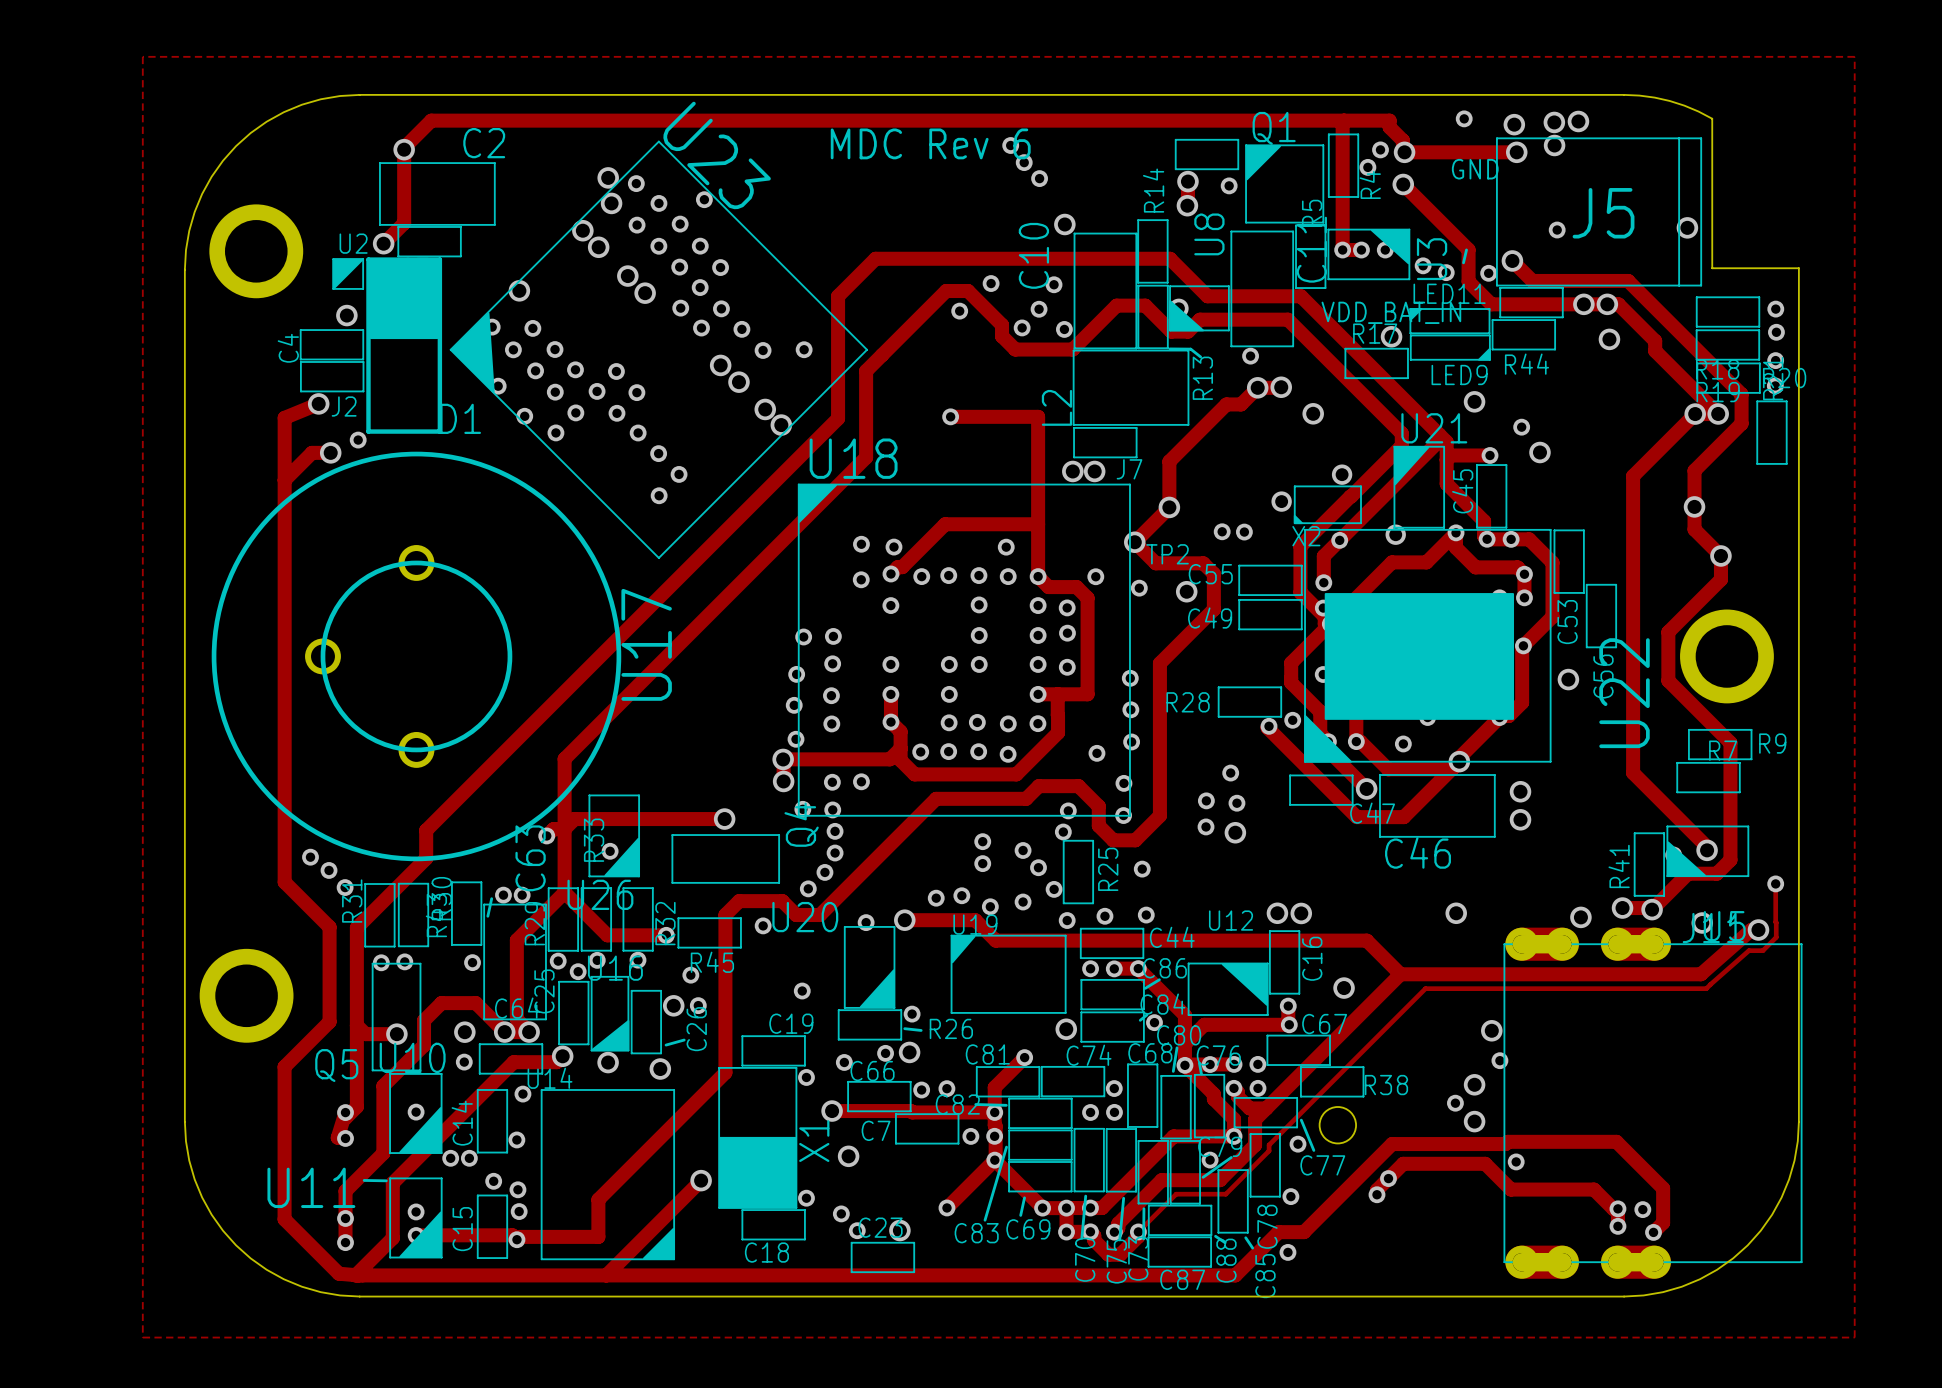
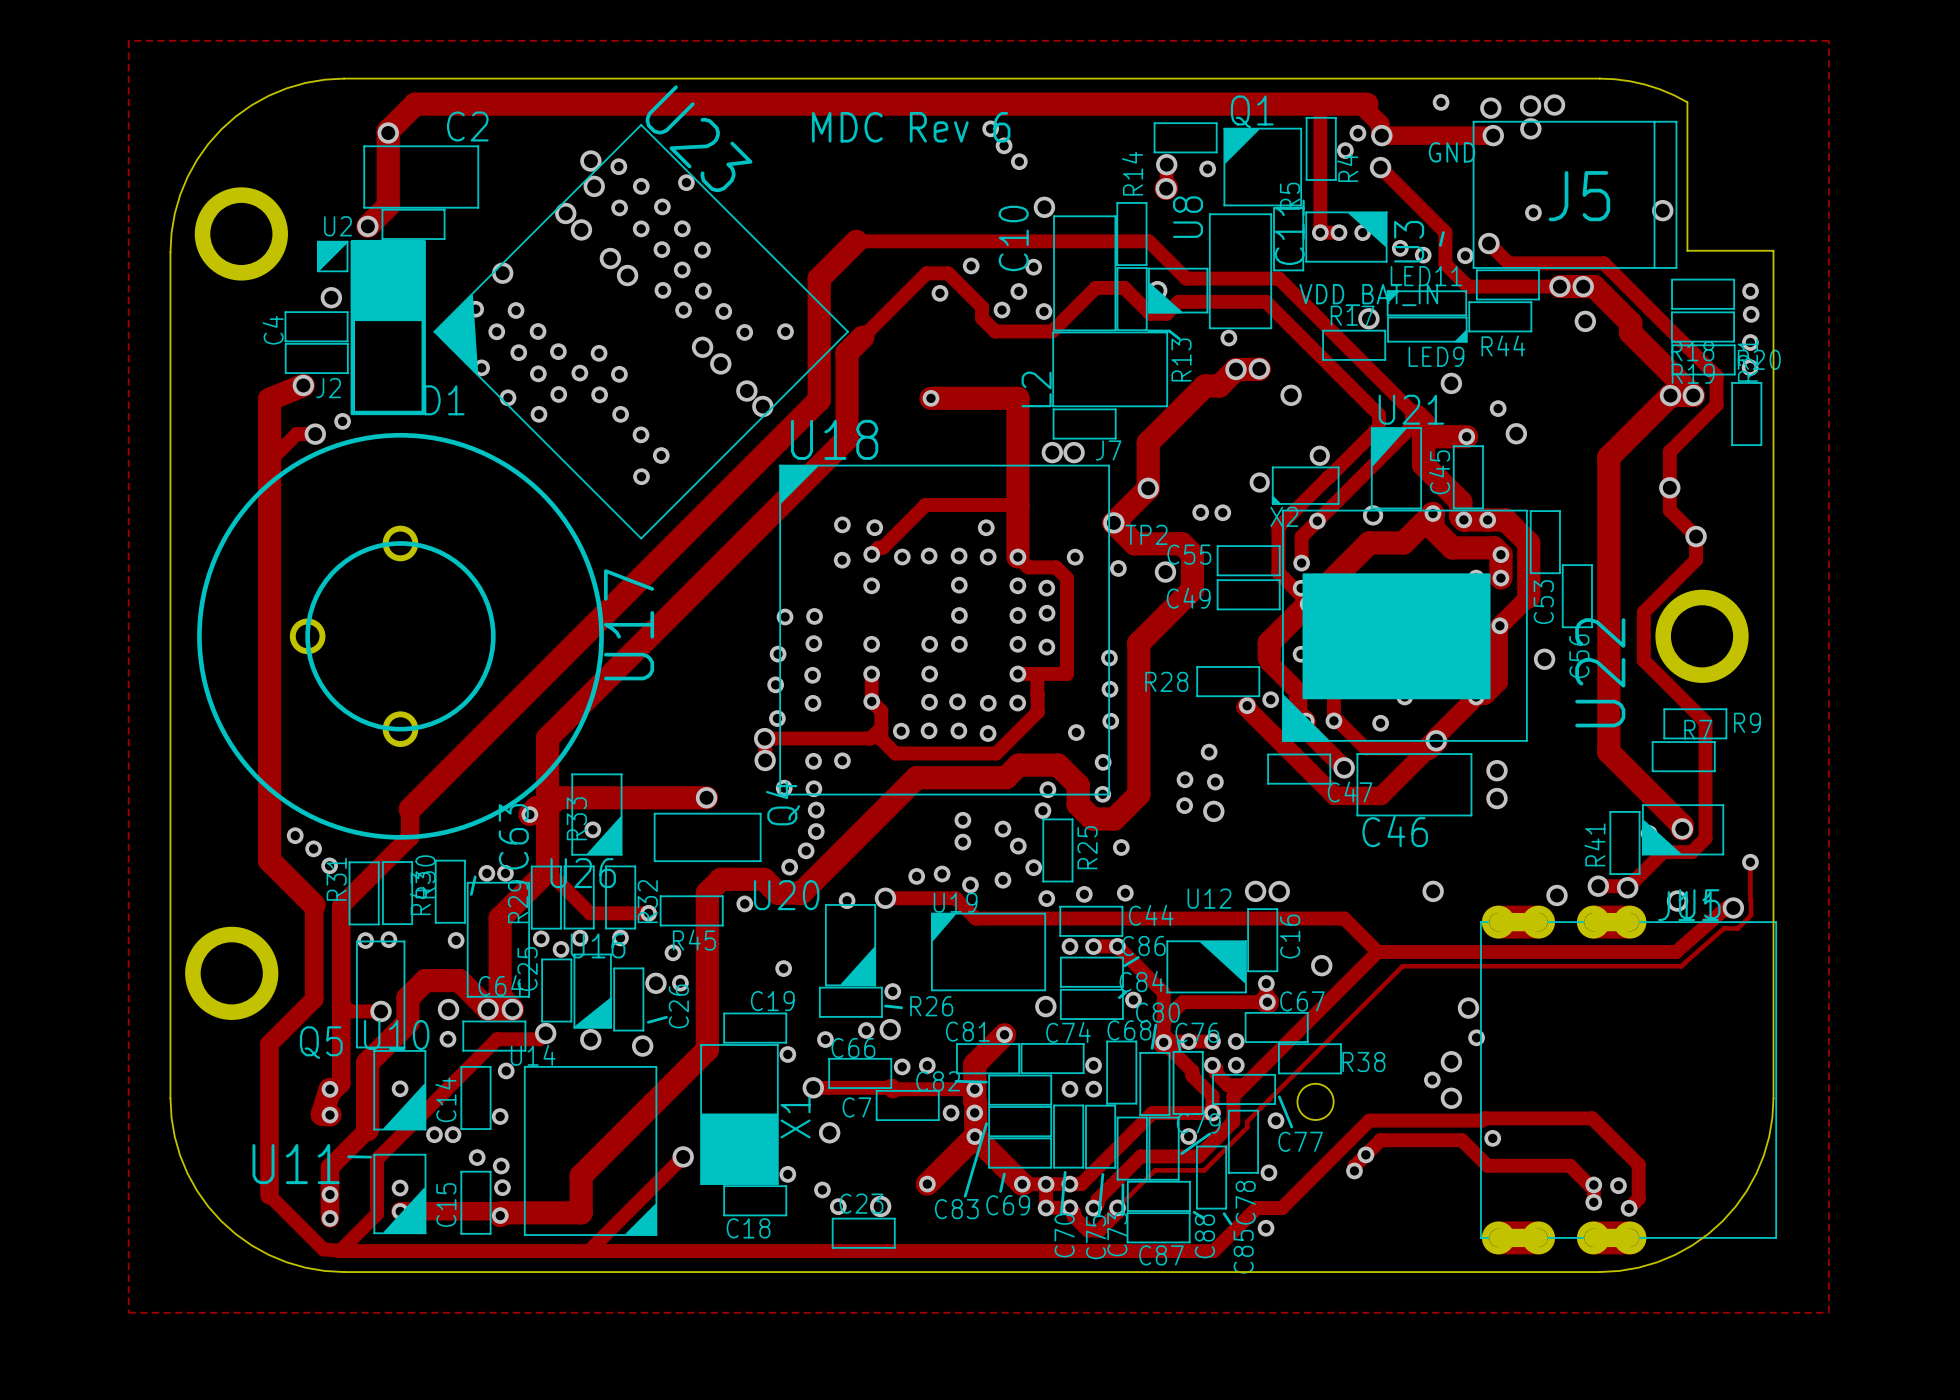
track width: thin (1516, 152) (1404, 152) (1402, 140) (1389, 127) (1389, 120) (431, 120) (404, 147) (404, 223) (383, 243) -> thick (1493, 135) (1381, 135) (1380, 123) (1366, 110) (1366, 104) (415, 104) (388, 131) (388, 205) (367, 226)
track width: thin (875, 258) (838, 296) (838, 418) (426, 830) (426, 858) (356, 927) (356, 1106) (345, 1118) (345, 1112) (337, 1137) (345, 1138) -> thick (856, 241) (819, 278) (819, 400) (410, 809) (410, 836) (341, 905) (341, 1083) (330, 1094) (330, 1089) (322, 1114) (330, 1115)
track width: thin (1583, 304) (1618, 304) (1655, 341) (1655, 350) (1718, 413) (1695, 414) (1633, 476) (1633, 772) (1707, 846) (1707, 850) -> thick (1559, 286) (1594, 286) (1630, 323) (1630, 332) (1693, 395) (1670, 395) (1608, 457) (1608, 752) (1682, 825) (1682, 828)
track width: thin (882, 355) (866, 371) (866, 457) (564, 758) (564, 892) (516, 940) (516, 1019) (529, 1032) (504, 1032) (475, 1003) (441, 1003) (424, 1020) (424, 1045) (383, 1086) (383, 1153) (345, 1191) (345, 1242) -> thick (862, 337) (847, 352) (847, 438) (547, 738) (547, 870) (500, 918) (500, 996) (512, 1009) (488, 1009) (459, 980) (425, 980) (407, 998) (407, 1022) (367, 1062) (367, 1129) (330, 1167) (330, 1218)
track width: thin (1281, 387) (1257, 387) (1241, 404) (1226, 404) (1169, 461) (1169, 507) (1134, 542) (1155, 563) (1203, 563) (1213, 573) (1213, 609) (1159, 663) (1159, 815) (1135, 840) (1113, 840) (1098, 825) (1098, 806) (1078, 786) (1038, 786) (1026, 798) (936, 798) (819, 915) (796, 915) (782, 901) (739, 901) (725, 914) (725, 1072) (598, 1199) (598, 1236) (519, 1236) (516, 1239) (512, 1235) (416, 1235) -> thick (1259, 368) (1235, 369) (1219, 386) (1204, 386) (1148, 442) (1148, 488) (1113, 522) (1134, 543) (1182, 543) (1192, 554) (1192, 589) (1138, 643) (1138, 794) (1114, 818) (1092, 818) (1078, 804) (1078, 785) (1058, 765) (1018, 765) (1005, 777) (916, 777) (801, 893) (777, 893) (763, 879) (721, 879) (707, 893) (707, 1049) (581, 1175) (581, 1212) (503, 1212) (500, 1215) (495, 1211) (400, 1211)
track width: thin (318, 403) (284, 417) (284, 882) (329, 927) (329, 1021) (284, 1066) (284, 1219) -> thick (303, 385) (269, 399) (269, 860) (314, 905) (314, 999) (269, 1043) (269, 1195)
track width: thin (950, 416) (1038, 416) (1038, 576) -> thick (930, 398) (1017, 398) (1017, 557)
track width: thin (1439, 434) (1446, 442) (1446, 483) (1484, 521) (1484, 536) (1487, 539) (1529, 539) (1552, 562) (1552, 616) (1522, 647) (1522, 702) (1508, 715) (1501, 715) (1459, 757) (1459, 761) (1403, 817) (1356, 817) (1267, 727) (1269, 726) -> thick (1416, 416) (1423, 423) (1423, 464) (1460, 502) (1460, 516) (1463, 520) (1505, 520) (1528, 543) (1528, 596) (1498, 627) (1498, 682) (1485, 695) (1477, 695) (1436, 736) (1436, 740) (1381, 795) (1334, 795) (1245, 707) (1247, 705)
track width: thin (1490, 455) (1451, 455) (1446, 459) -> thick (1466, 436) (1427, 436) (1423, 441)
track width: thin (1524, 597) (1524, 574) (1517, 567) (1475, 567) (1455, 547) (1455, 532) (1426, 562) (1391, 562) (1327, 626) -> thick (1500, 578) (1500, 554) (1494, 547) (1452, 547) (1432, 528) (1432, 513) (1403, 542) (1369, 542) (1305, 607)
track width: thin (1327, 626) (1291, 663) (1291, 682) (1320, 711) (1320, 733) (1328, 741) (1328, 750) (1366, 788) -> thick (1305, 606) (1269, 642) (1269, 662) (1298, 691) (1298, 712) (1306, 721) (1306, 729) (1344, 767)
track width: thin (724, 819) (574, 819) (564, 829) (553, 829) (546, 835) -> thick (706, 797) (557, 797) (547, 807) (536, 807) (529, 814)
track width: thin (1024, 1057) (994, 1087) (995, 1159) (947, 1207) -> thick (1004, 1034) (974, 1064) (975, 1135) (927, 1184)
track width: thin (994, 1160) (1042, 1207) -> thick (974, 1136) (1022, 1184)

